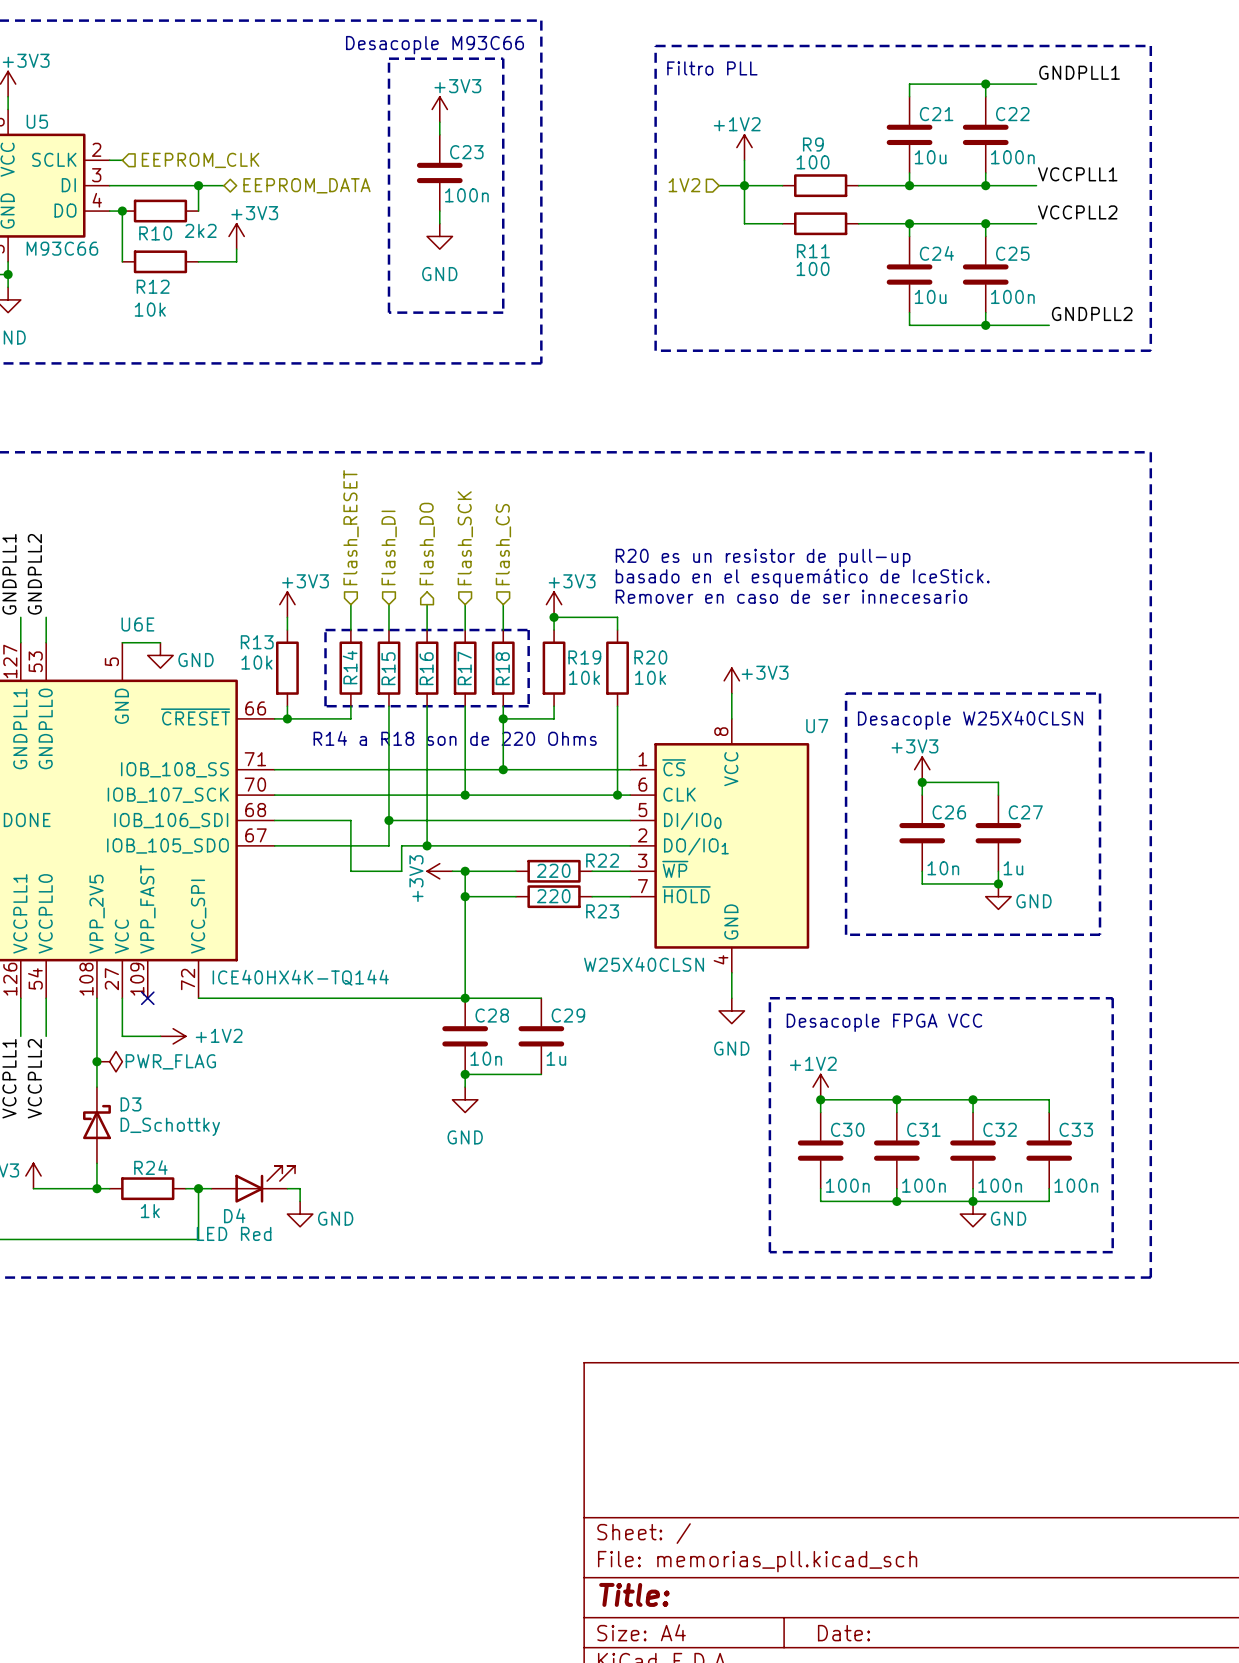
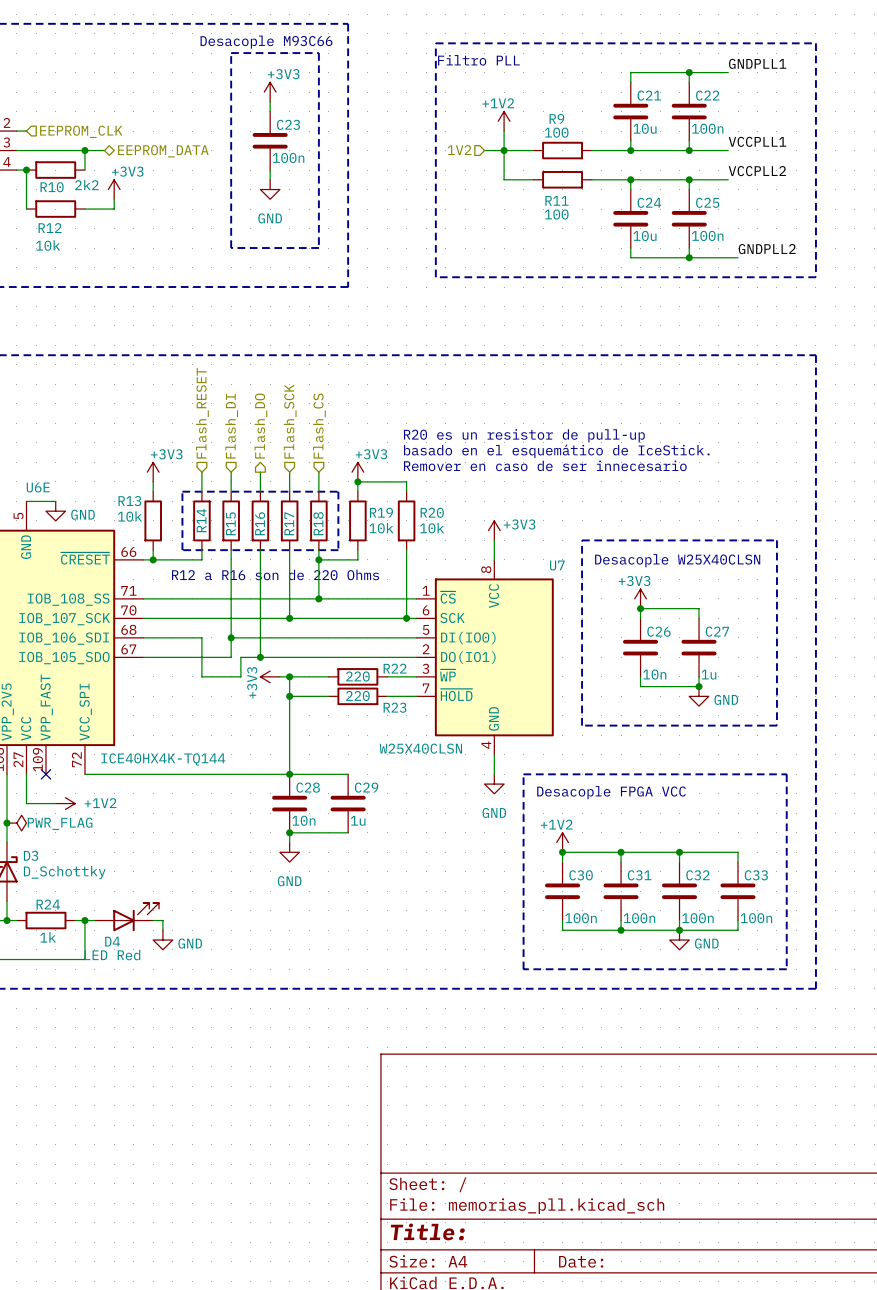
text: R14 a R18 son de 220 Ohms (455, 738) -> R12 a R16 son de 220 Ohms (275, 574)
U7 pin name: CLK (679, 794) -> SCK (452, 618)
U7 pin name: DI/IO0 (692, 821) -> DI(IO0) (468, 638)
U7 pin name: DO/IO1 (696, 846) -> DO(IO1) (468, 657)

